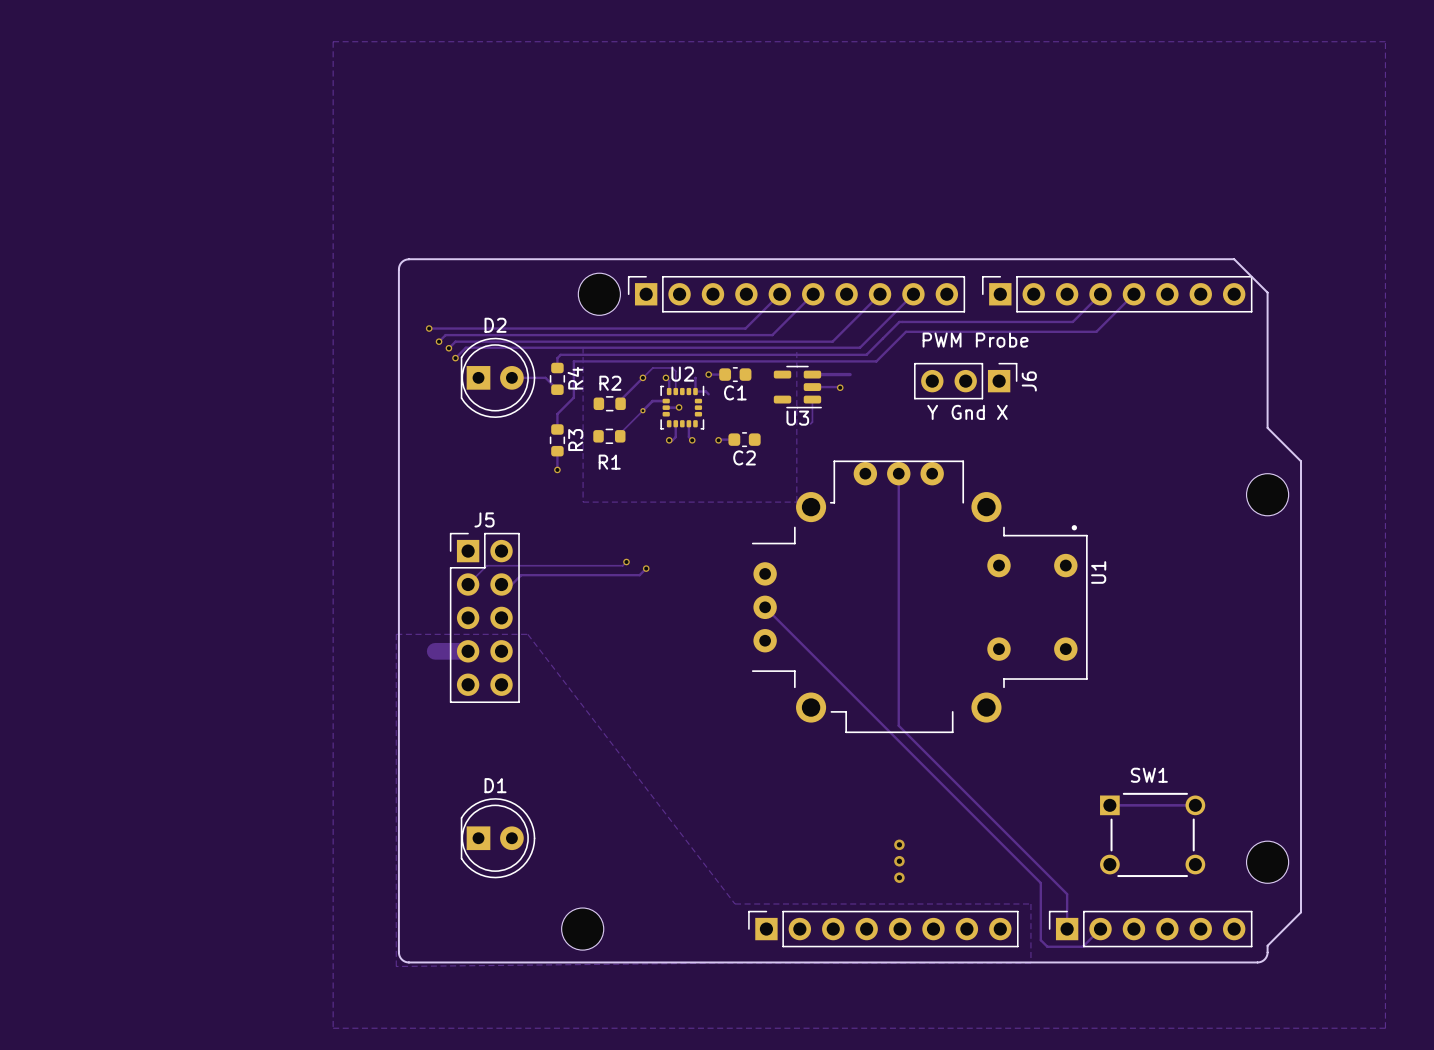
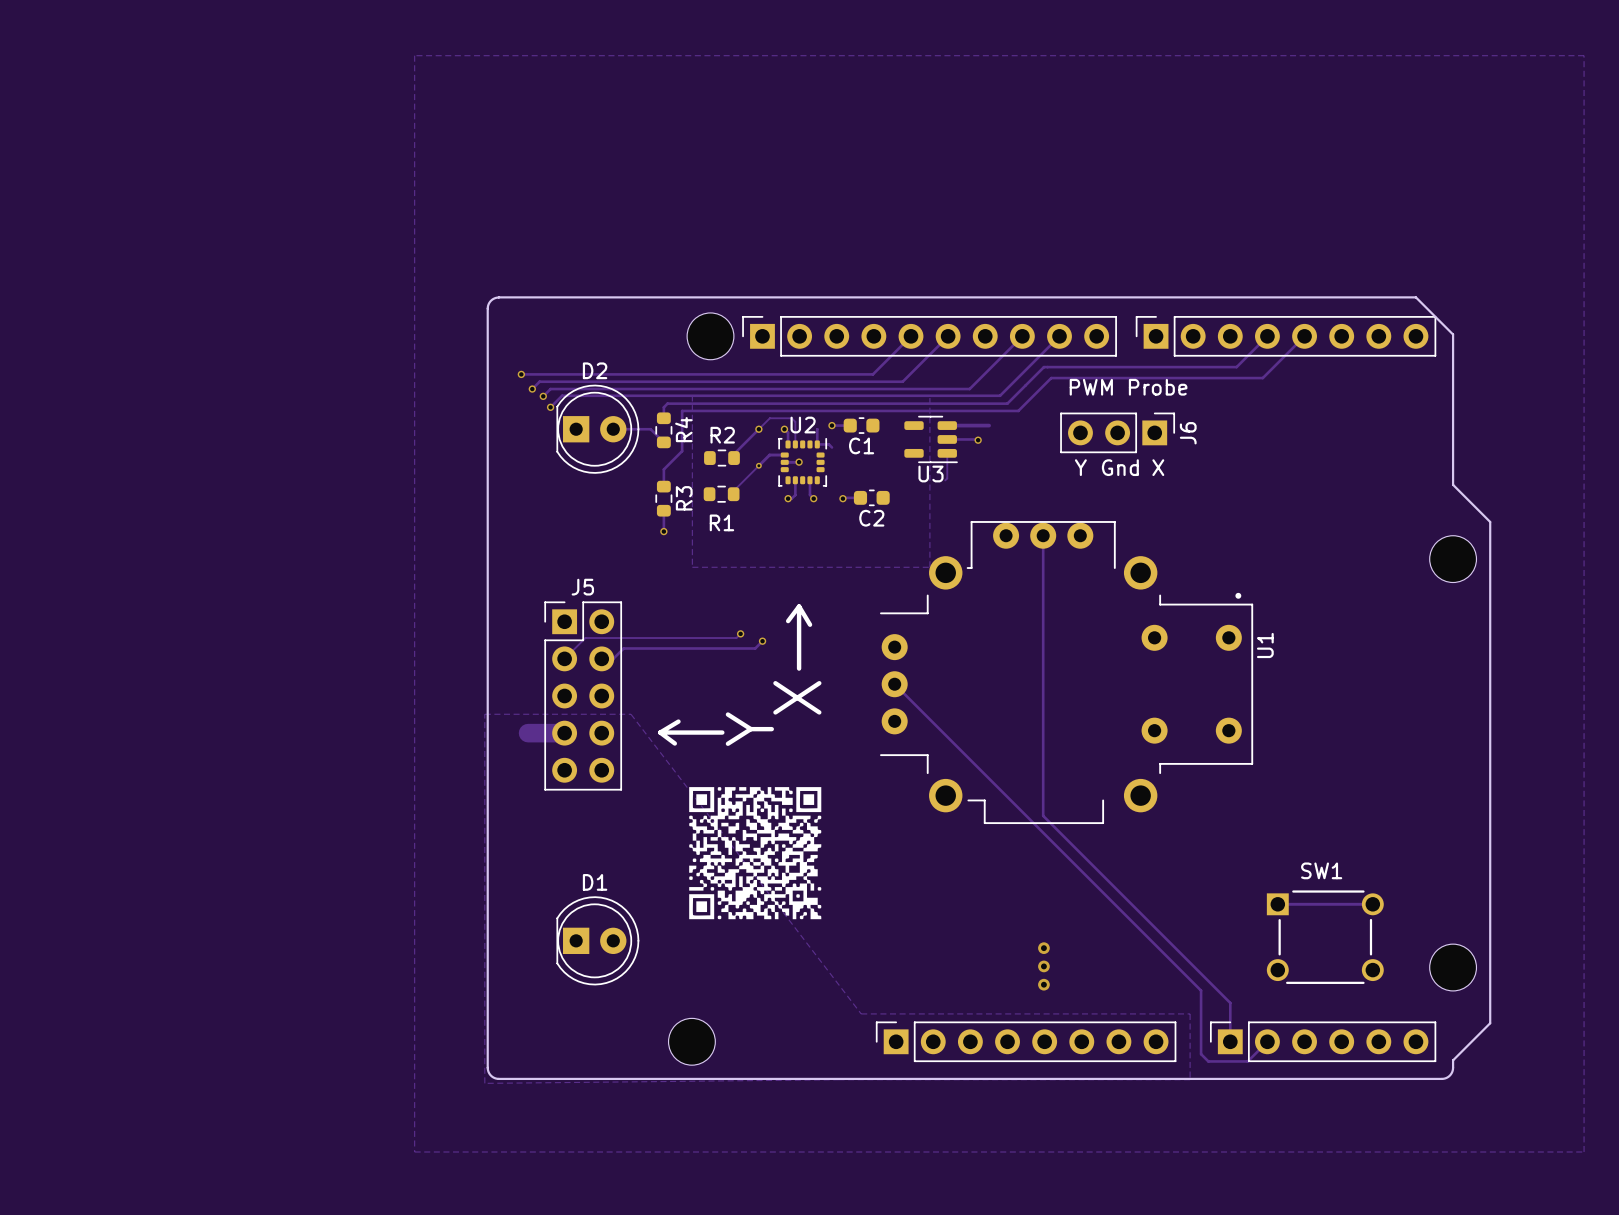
line: none -> (799, 606) (799, 668)
line: none -> (799, 606) (810, 624)
line: none -> (799, 606) (788, 621)
text: none -> X (797, 697)
text: none -> Y (749, 729)
line: none -> (660, 732) (674, 743)
line: none -> (660, 732) (678, 721) (660, 732)
line: none -> (660, 732) (722, 732)
drawing: none -> [689, 787, 822, 920]

